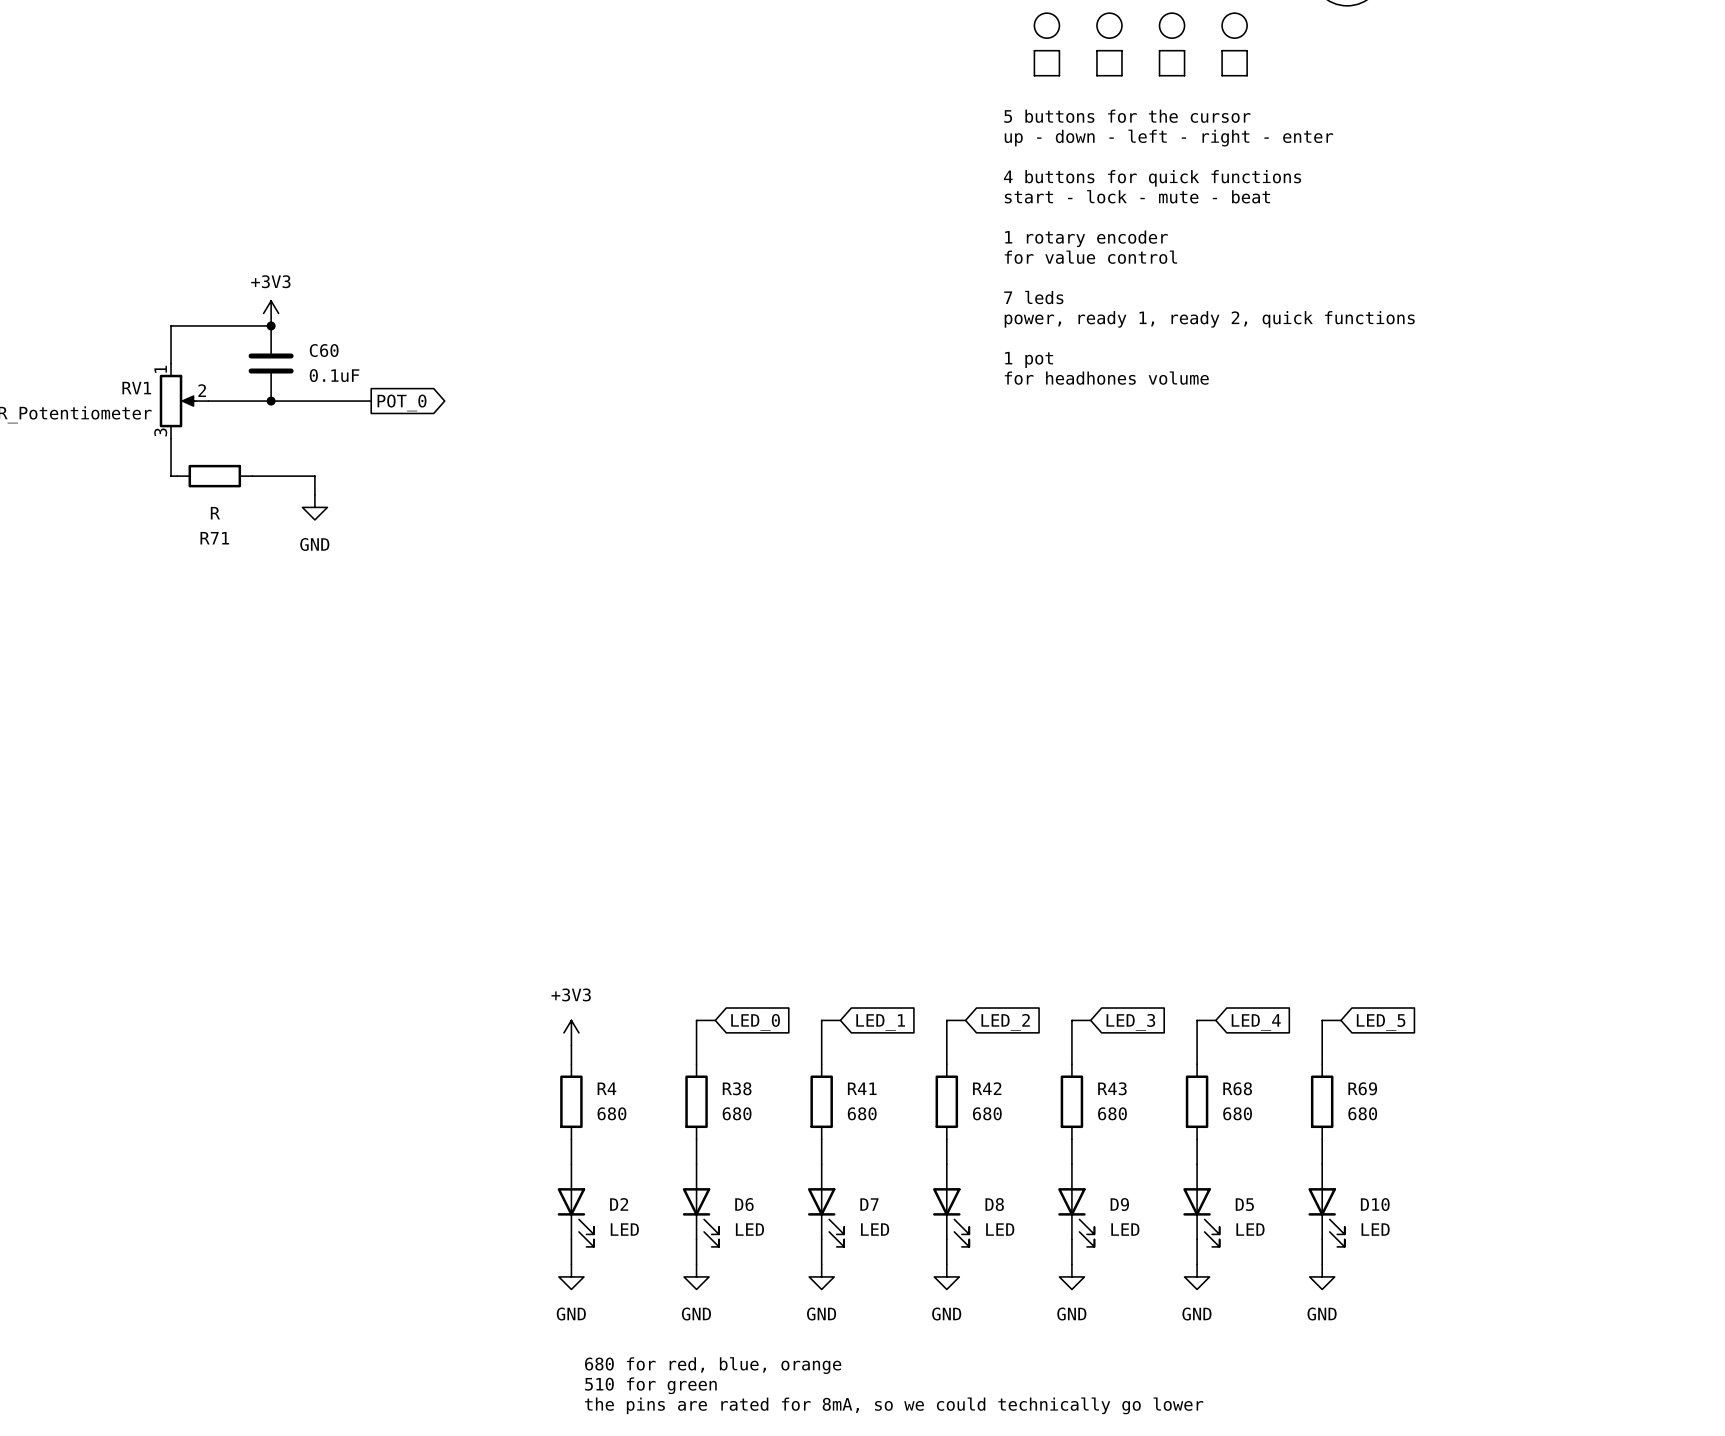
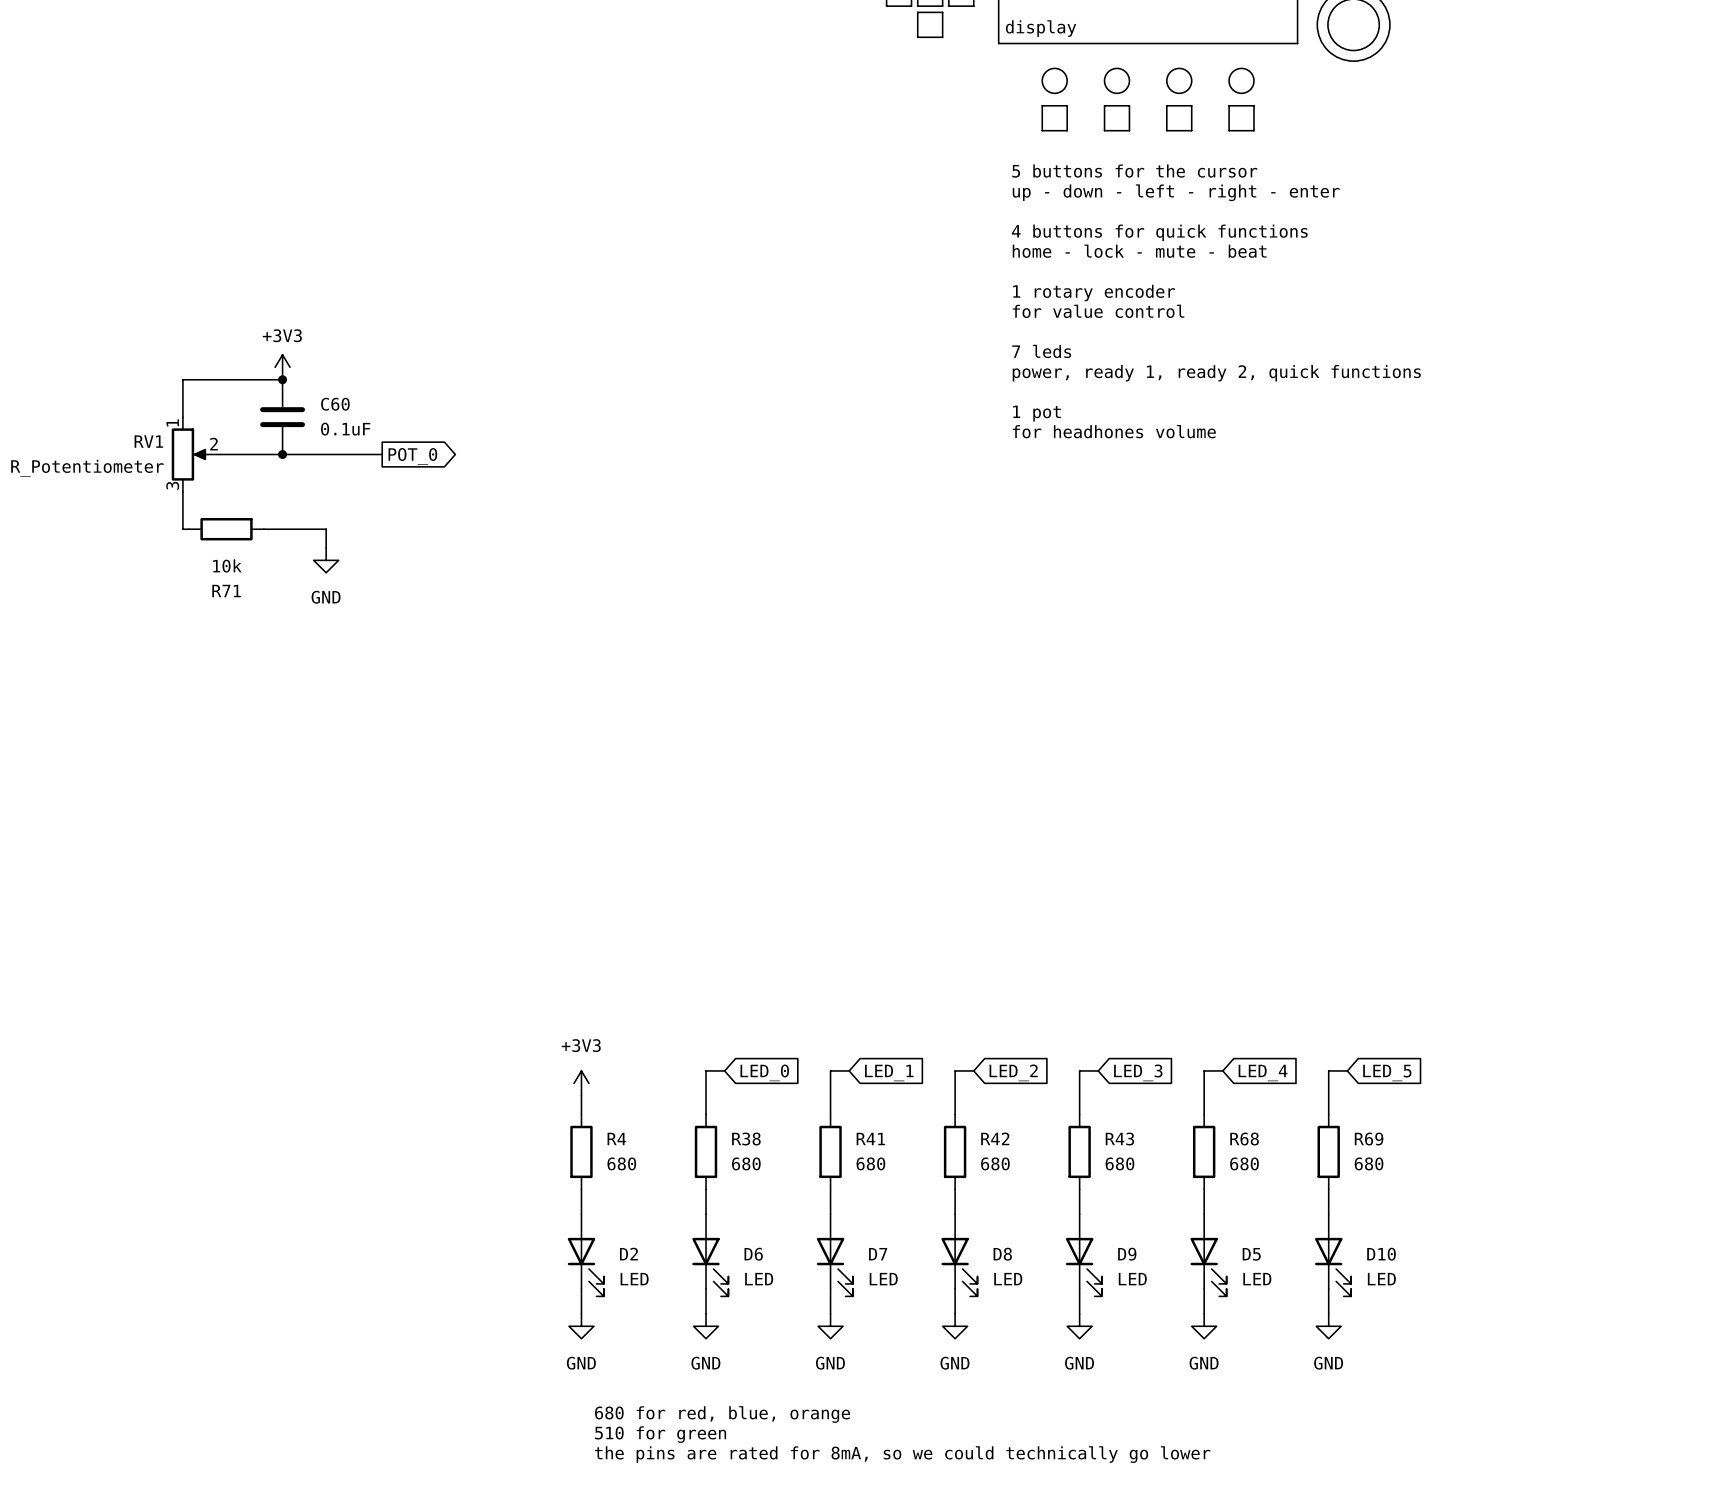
text: start - lock - mute - beat (1137, 196) -> home - lock - mute - beat (1139, 251)
R71 value: R (215, 513) -> 10k (227, 565)

